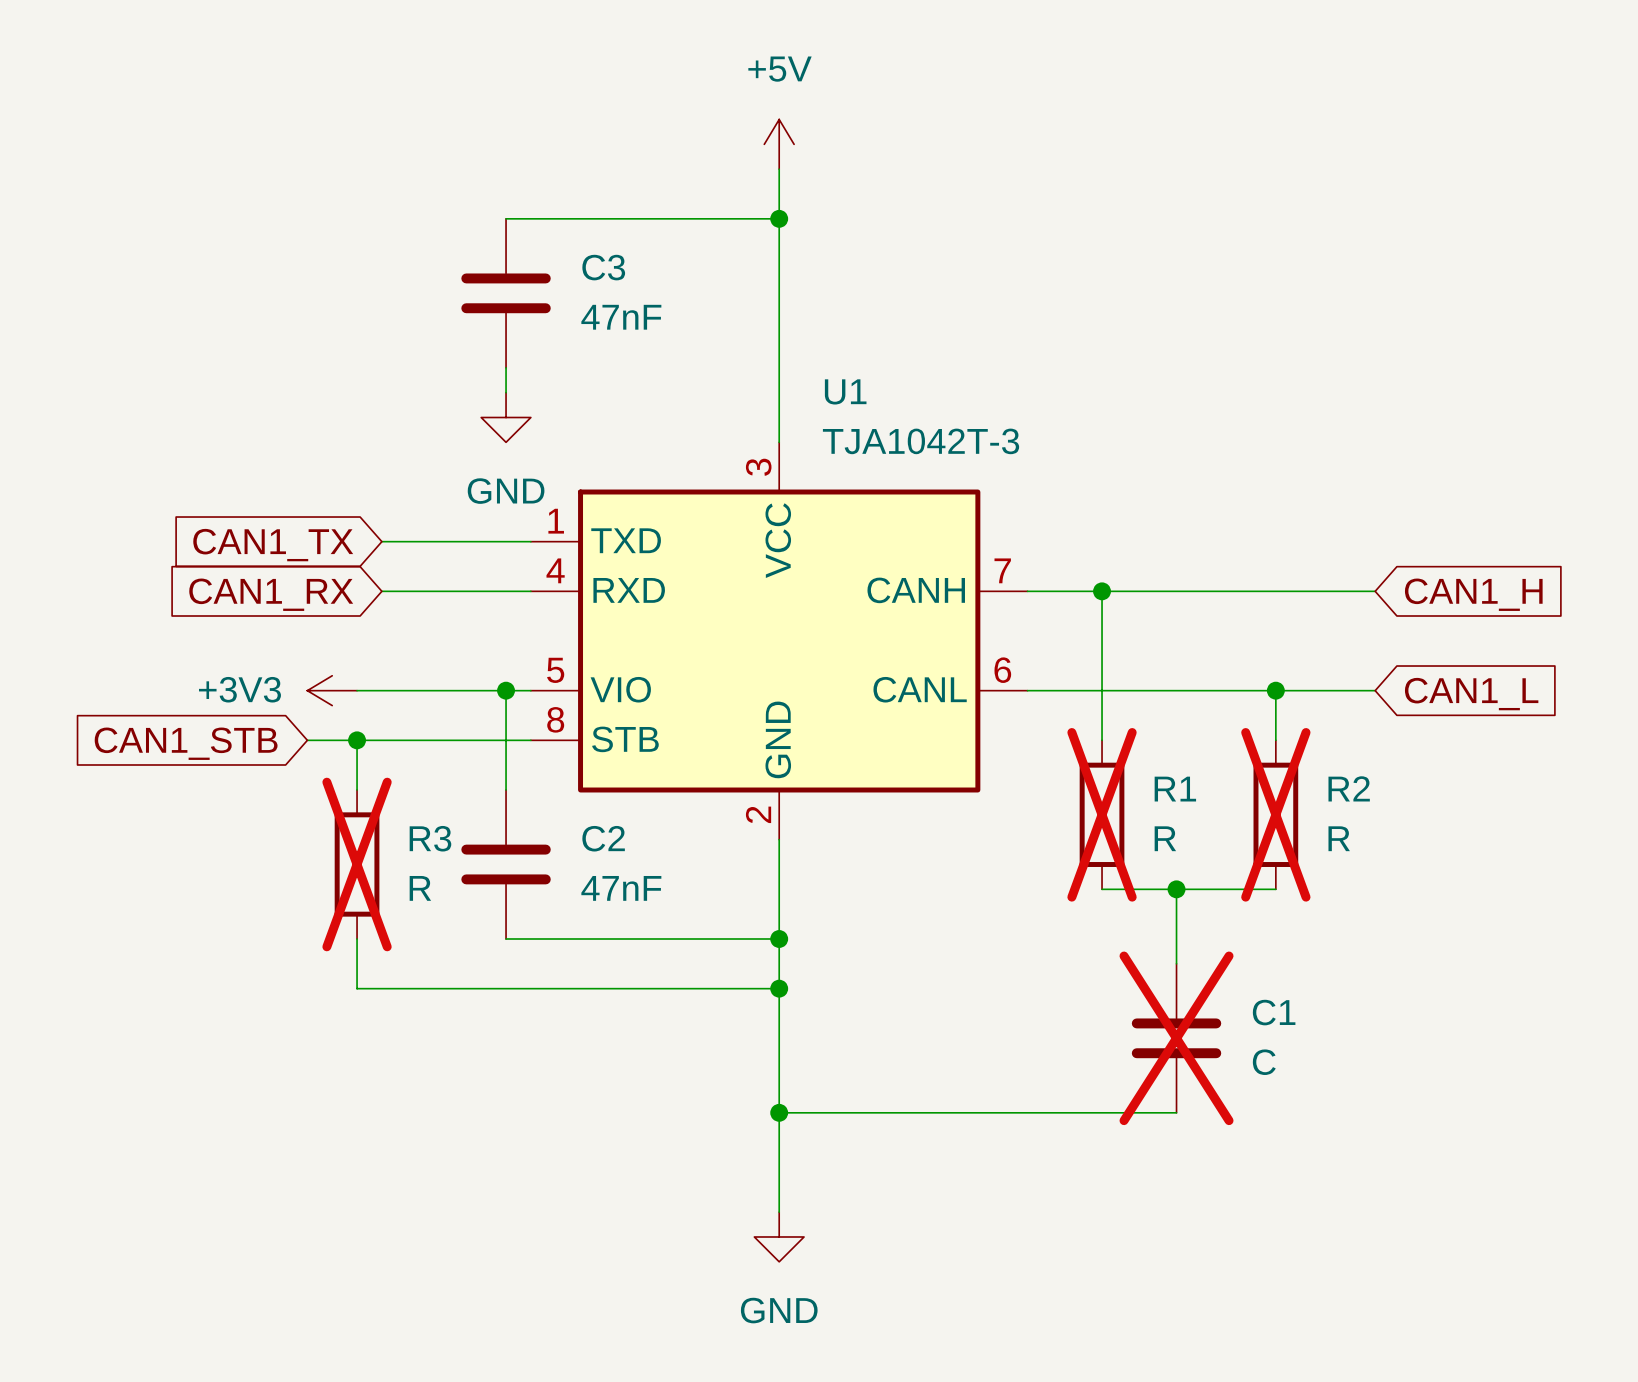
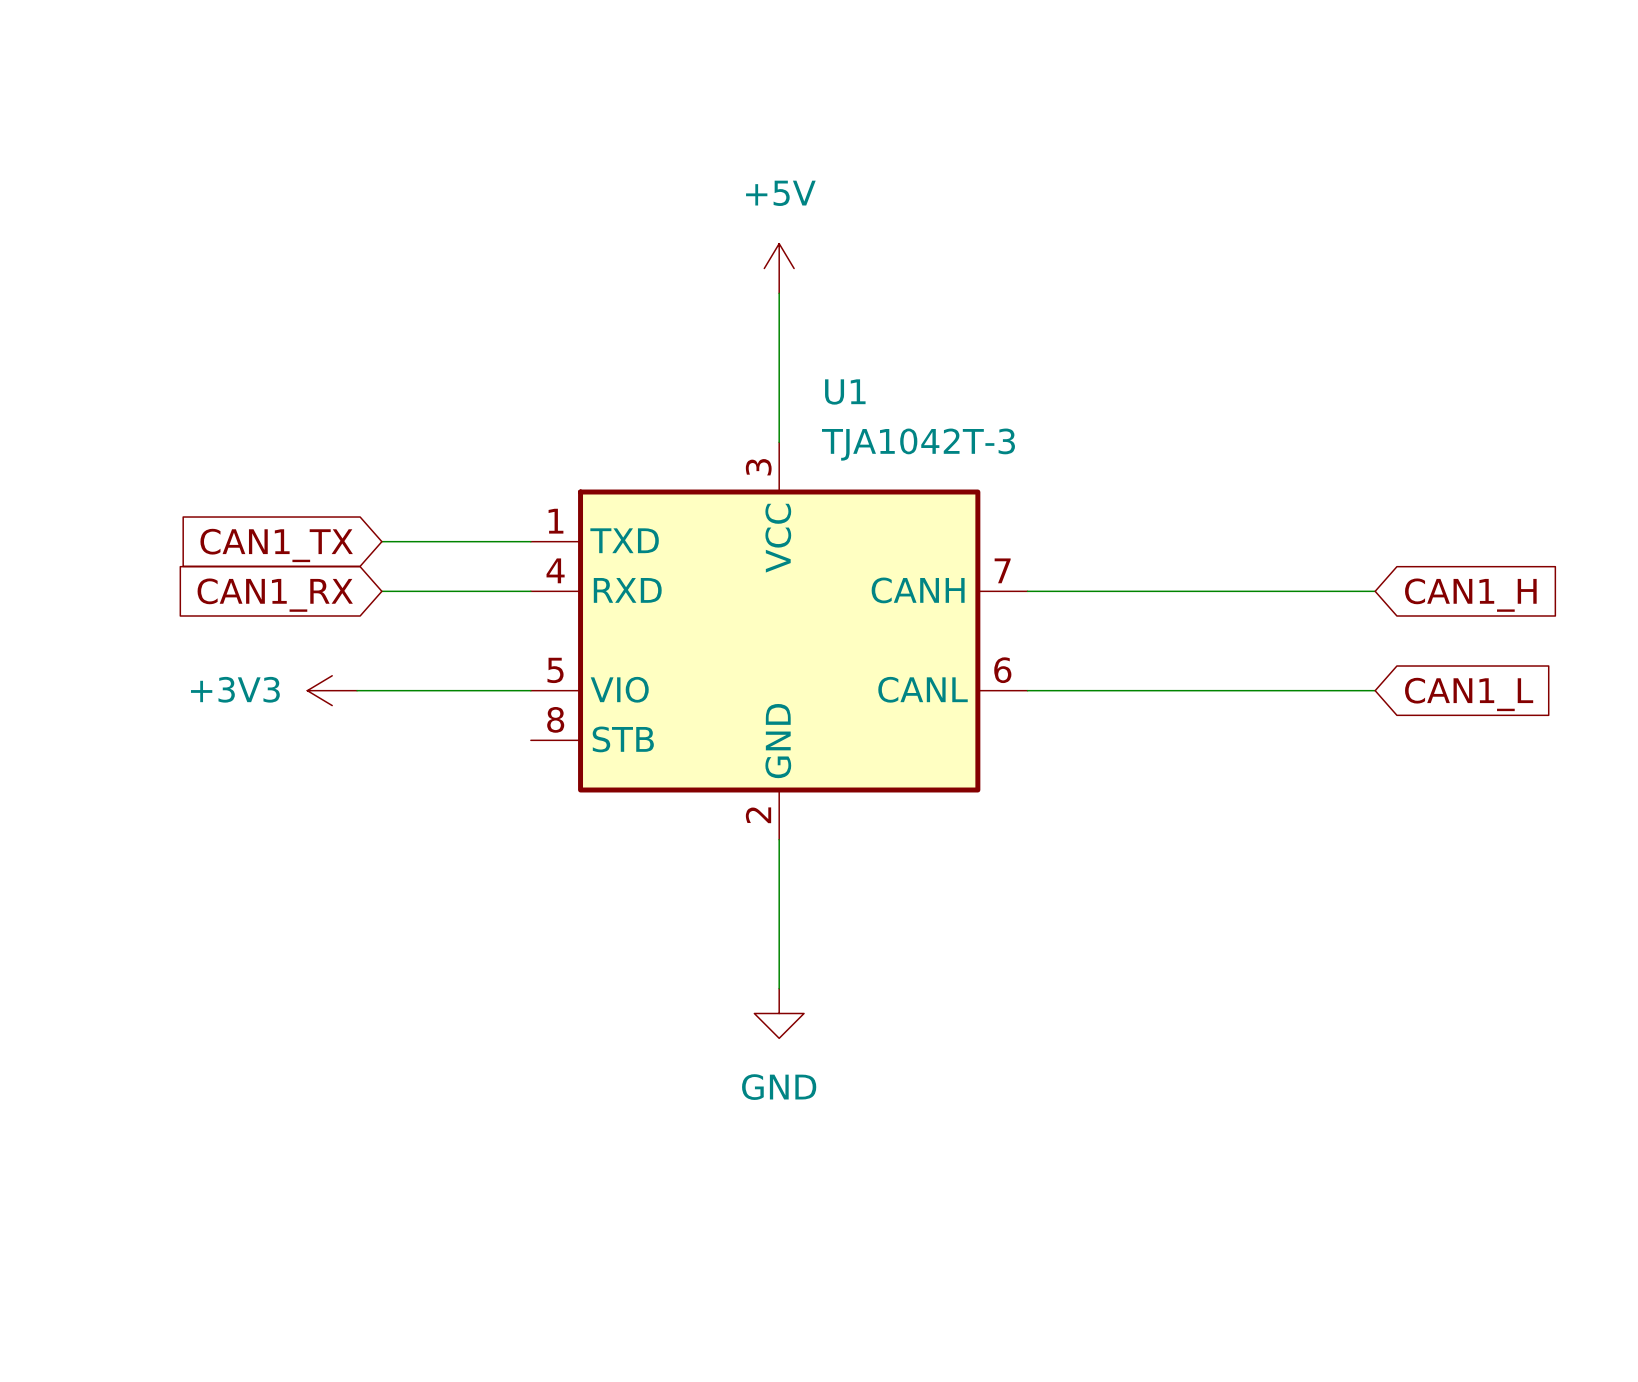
power symbol position: +5V (779, 144) -> +5V (779, 268)
wire: (779, 169) (779, 293) -> none
wire: (506, 218) (779, 218) -> none
junction: (779, 218) -> none
C3: 47nF (506, 293) -> none
wire: (506, 367) (506, 392) -> none
power symbol: GND (506, 417) -> none
wire: (1102, 591) (1102, 740) -> none
junction: (1102, 591) -> none
wire: (506, 690) (506, 790) -> none
junction: (506, 690) -> none
wire: (1275, 690) (1275, 740) -> none
junction: (1275, 690) -> none
wire: (307, 740) (530, 740) -> none
wire: (357, 740) (357, 790) -> none
junction: (357, 740) -> none
global label: CAN1_STB (186, 743) -> none
R1: R (1102, 814) -> none
R2: R (1275, 814) -> none
R3: R (357, 864) -> none
C2: 47nF (506, 864) -> none
wire: (1102, 889) (1275, 889) -> none
wire: (1176, 889) (1176, 963) -> none
junction: (1176, 889) -> none
wire: (357, 938) (357, 988) (779, 988) (779, 1212) -> none
wire: (506, 938) (779, 938) -> none
junction: (779, 938) -> none
junction: (779, 988) -> none
C1: C (1176, 1038) -> none
wire: (779, 1112) (1176, 1112) -> none
junction: (779, 1112) -> none
power symbol position: GND (779, 1236) -> GND (779, 1013)

